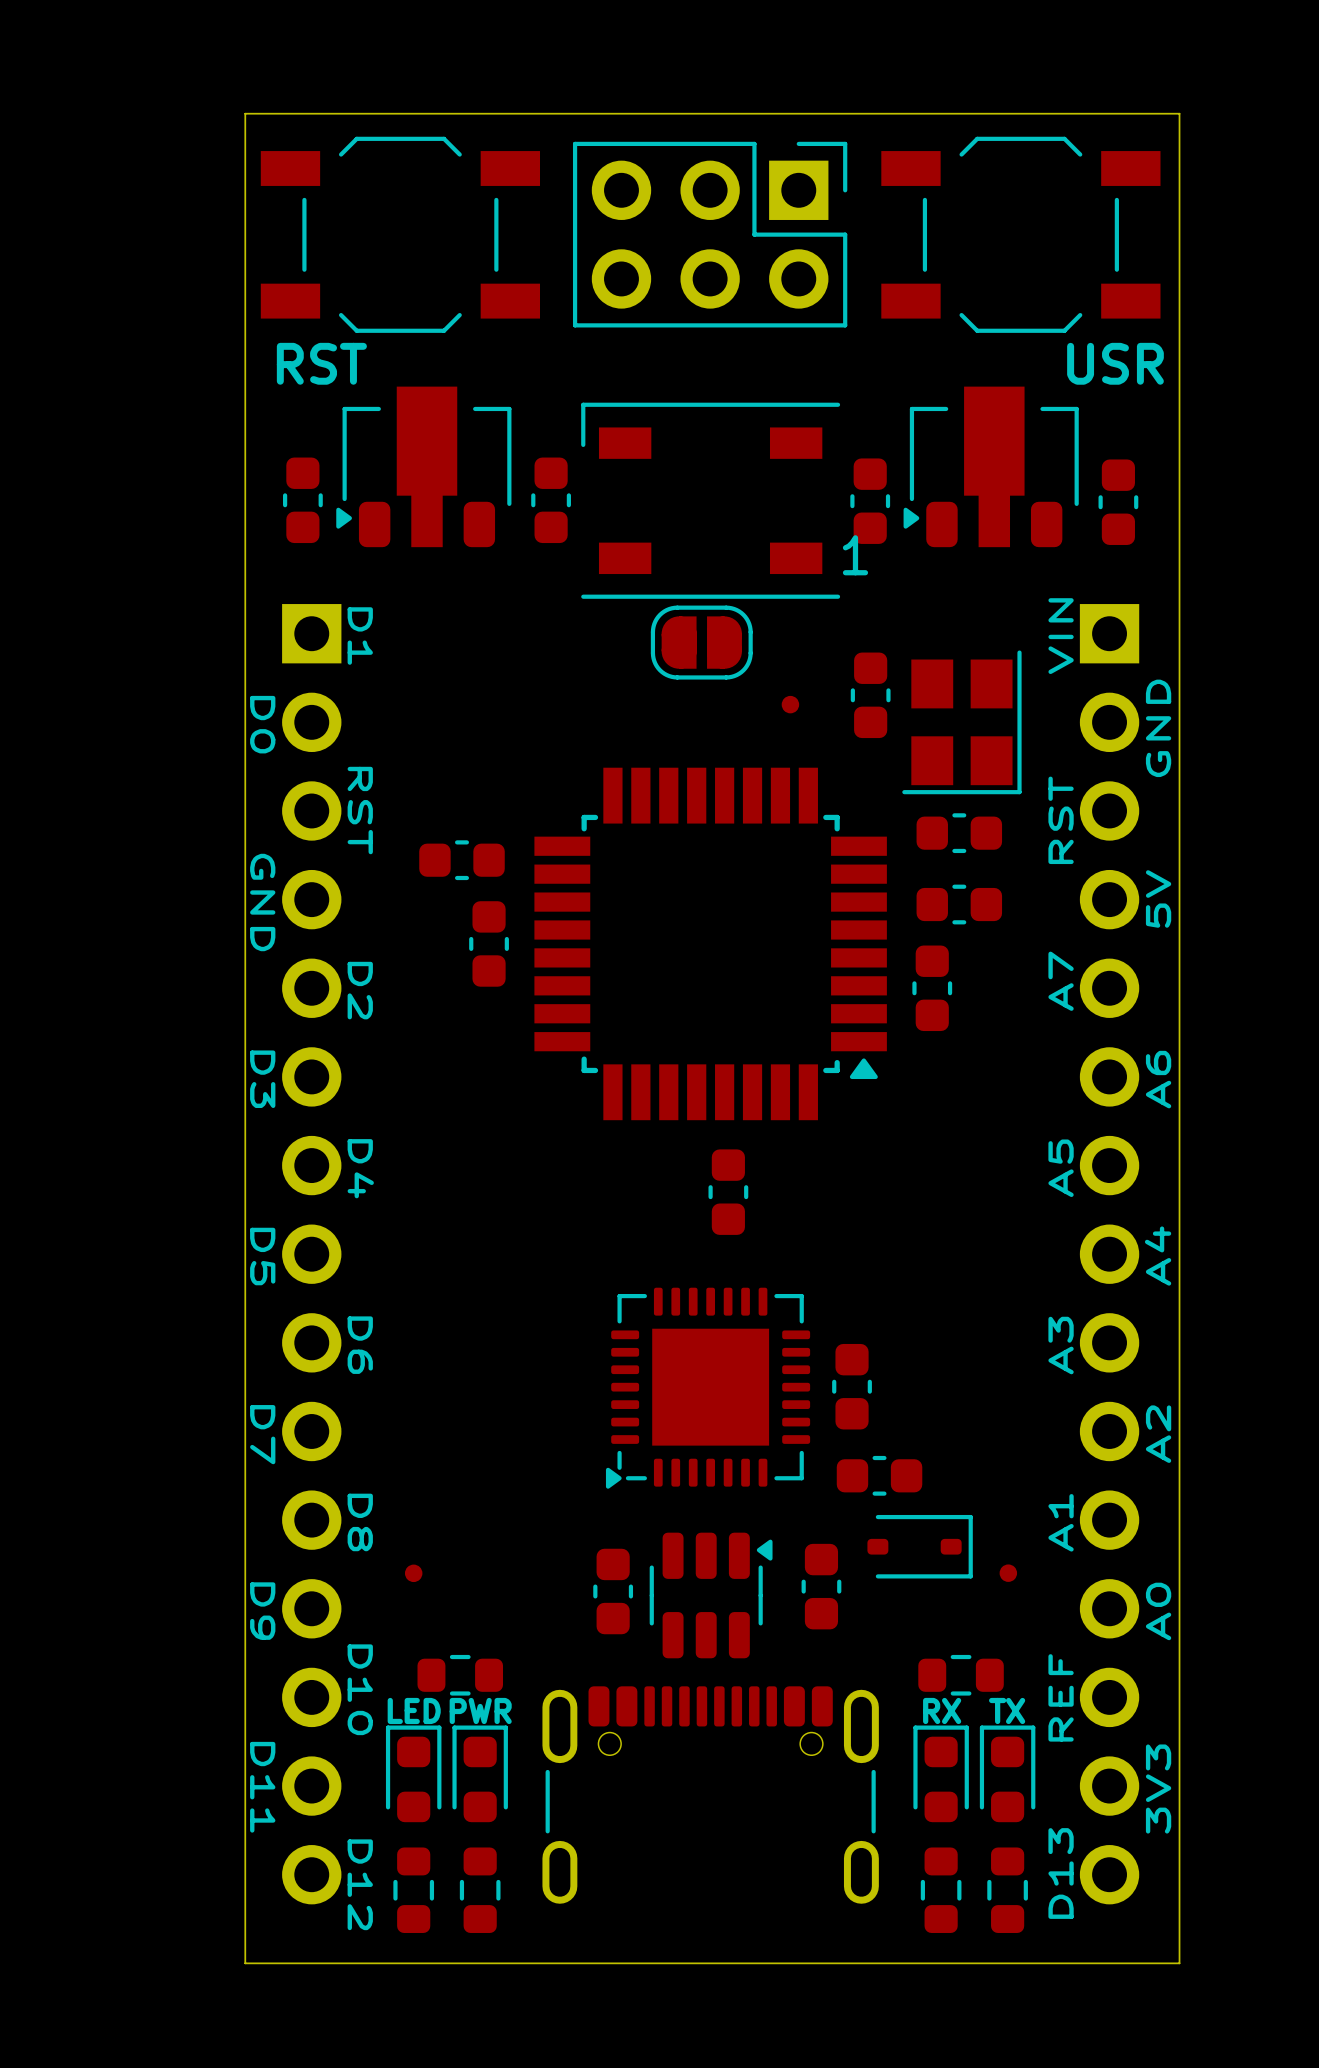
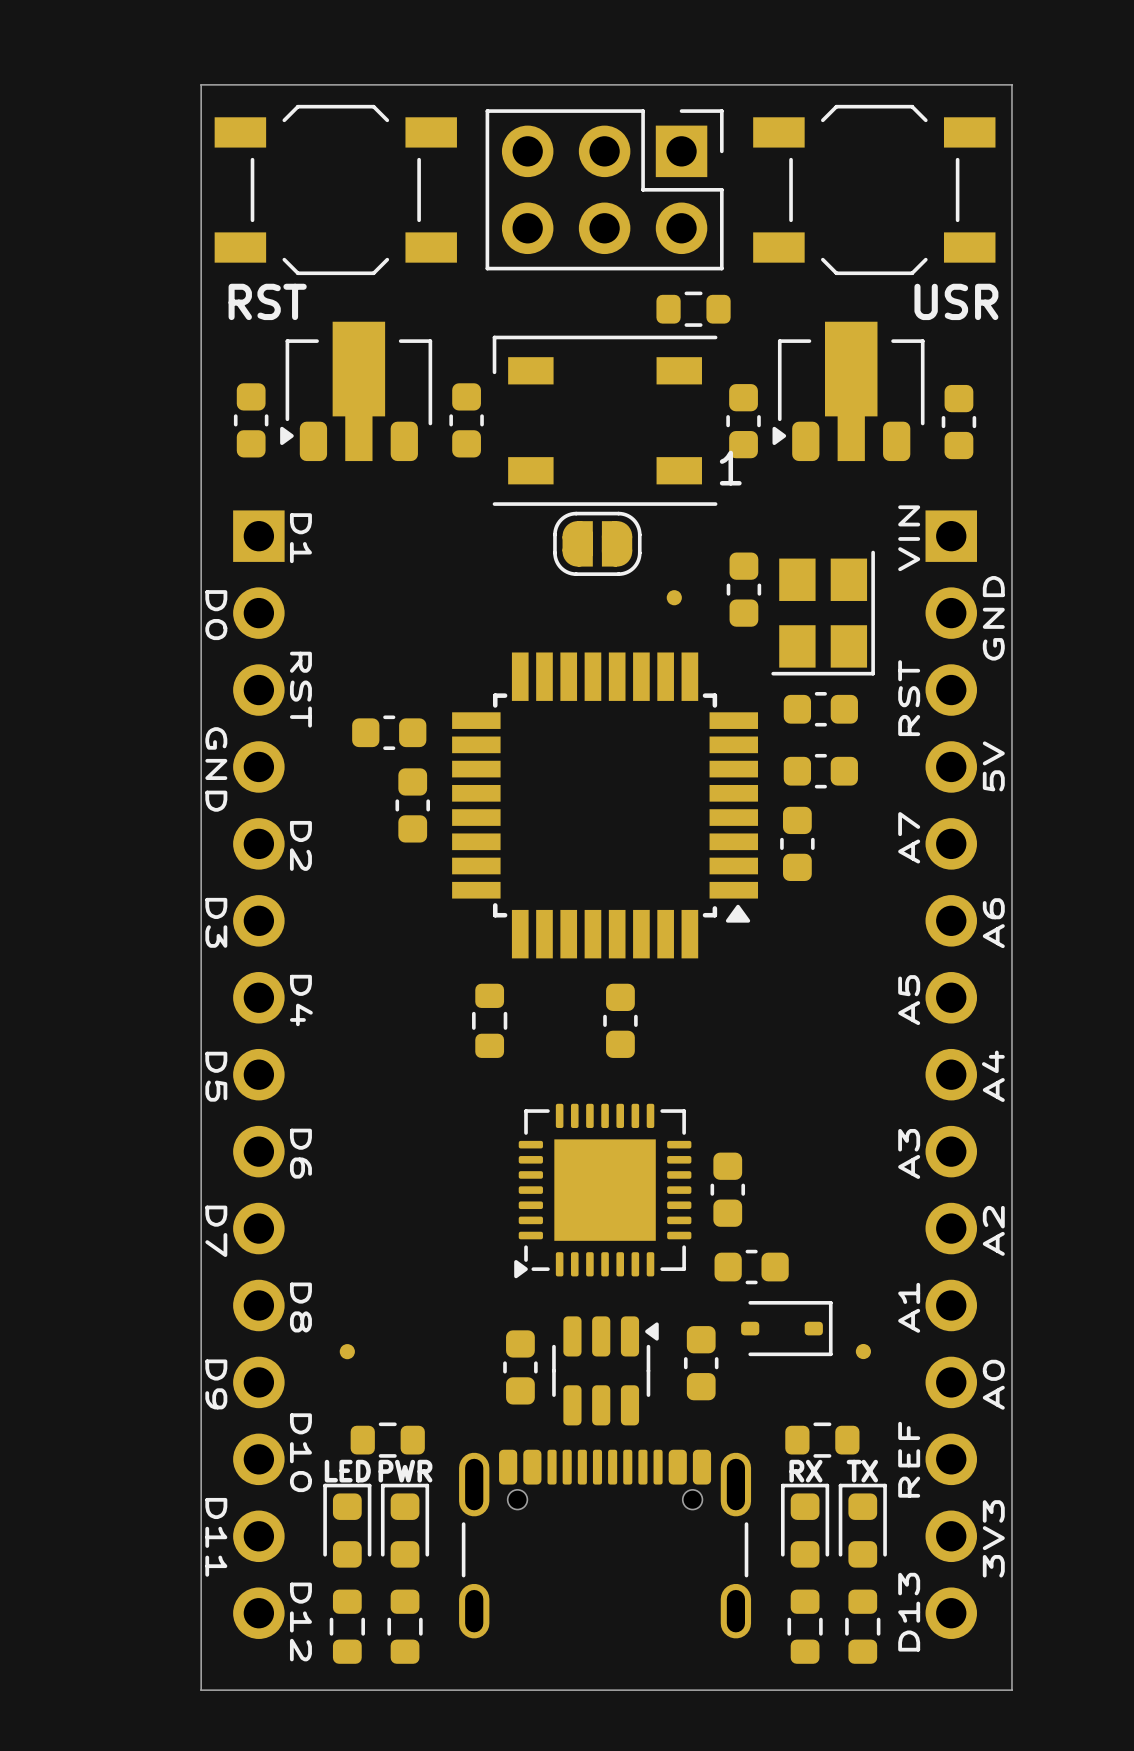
part: none -> (693, 309)
part: none -> (489, 1020)

